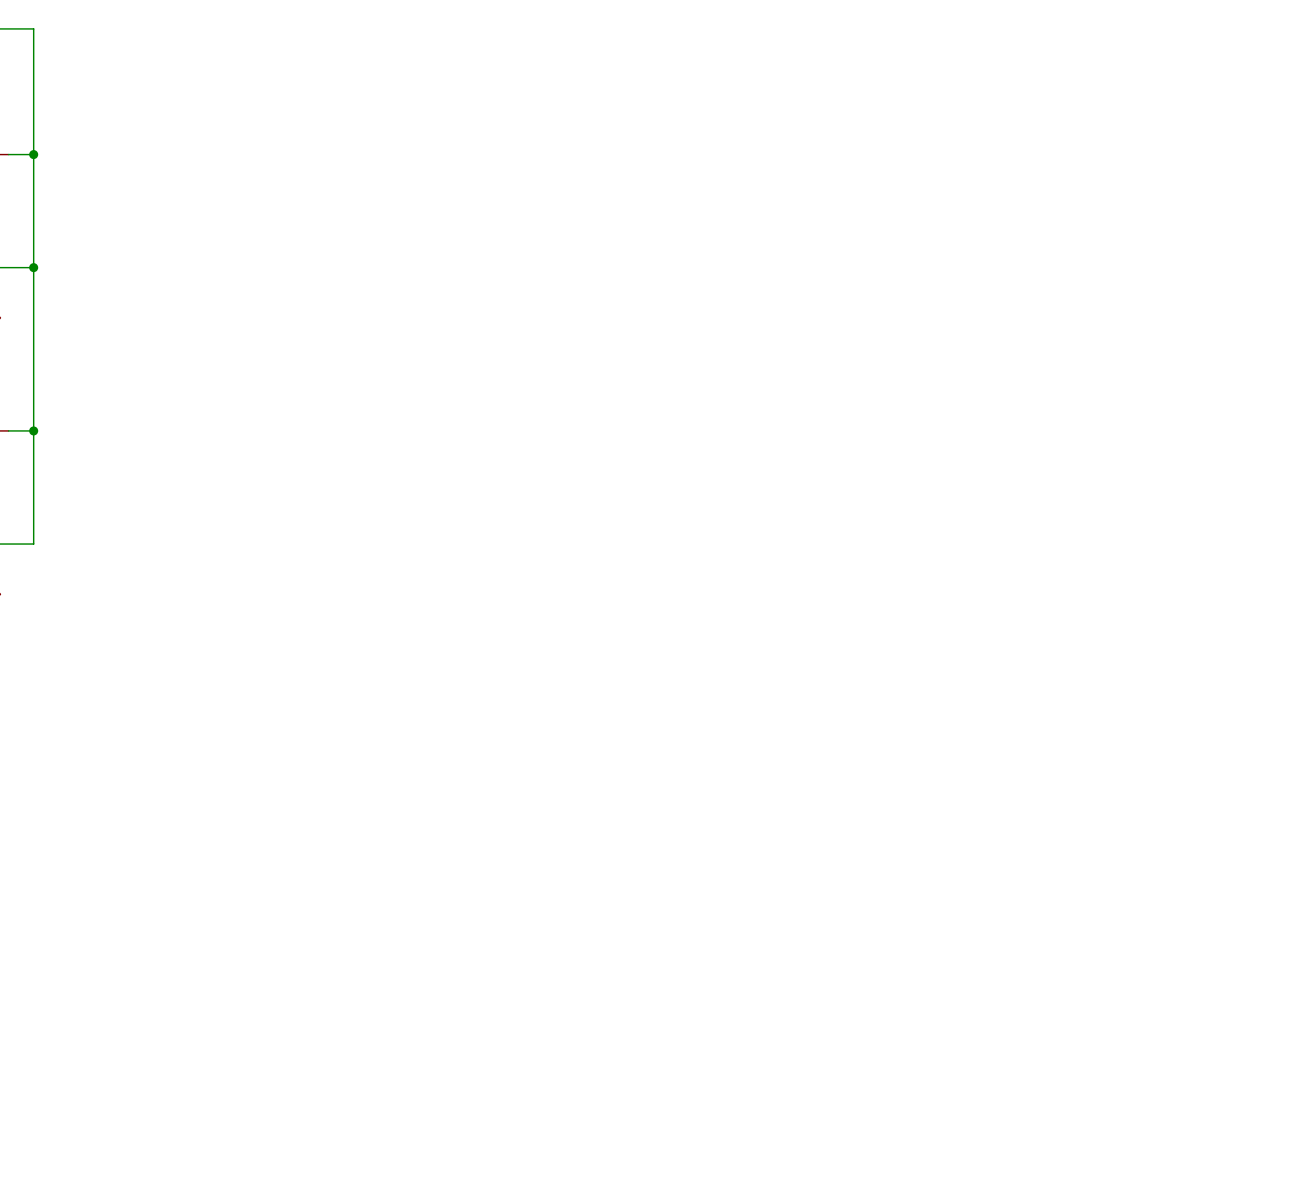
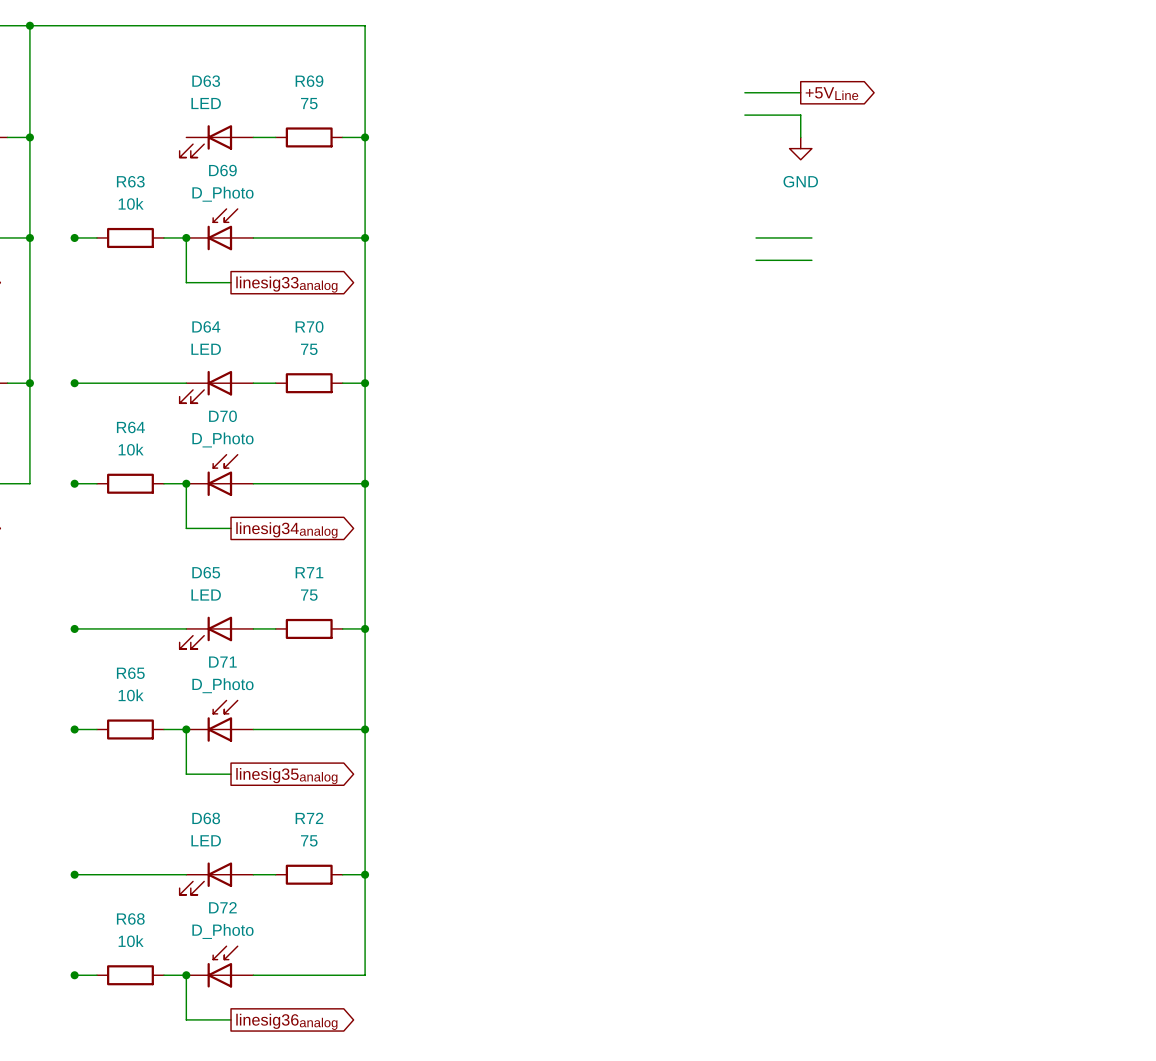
wire: none -> (29, 25) (365, 25) (365, 975) (253, 975)
junction: none -> (29, 25)
wire: none -> (744, 92) (800, 92)
global label: none -> +5VLine (831, 93)
wire: none -> (744, 115) (800, 115) (800, 137)
wire: none -> (253, 137) (275, 137)
R69: none -> 75 (309, 137)
wire: none -> (342, 137) (365, 137)
junction: none -> (365, 137)
D63: none -> LED (216, 141)
power symbol: none -> GND (800, 148)
D69: none -> D_Photo (219, 229)
wire: none -> (74, 237) (96, 237)
junction: none -> (74, 237)
R63: none -> 10k (130, 237)
wire: none -> (163, 237) (186, 237) (186, 282) (231, 282)
junction: none -> (186, 237)
wire: none -> (253, 237) (365, 237)
junction: none -> (365, 237)
wire: none -> (756, 237) (811, 237)
wire: none -> (756, 260) (811, 260)
global label: none -> linesig33analog (286, 284)
wire: none -> (74, 383) (186, 383)
junction: none -> (74, 383)
wire: none -> (253, 383) (275, 383)
R70: none -> 75 (309, 383)
wire: none -> (342, 383) (365, 383)
junction: none -> (365, 383)
D64: none -> LED (216, 387)
D70: none -> D_Photo (219, 475)
wire: none -> (74, 483) (96, 483)
junction: none -> (74, 483)
R64: none -> 10k (130, 483)
wire: none -> (163, 483) (186, 483) (186, 528) (231, 528)
junction: none -> (186, 483)
wire: none -> (253, 483) (365, 483)
junction: none -> (365, 483)
global label: none -> linesig34analog (286, 530)
wire: none -> (74, 628) (186, 628)
junction: none -> (74, 628)
wire: none -> (253, 628) (275, 628)
R71: none -> 75 (309, 628)
wire: none -> (342, 628) (365, 628)
junction: none -> (365, 628)
D65: none -> LED (216, 632)
D71: none -> D_Photo (219, 721)
wire: none -> (74, 729) (96, 729)
junction: none -> (74, 729)
R65: none -> 10k (130, 729)
wire: none -> (163, 729) (186, 729) (186, 774) (231, 774)
junction: none -> (186, 729)
wire: none -> (253, 729) (365, 729)
junction: none -> (365, 729)
global label: none -> linesig35analog (286, 776)
wire: none -> (74, 874) (186, 874)
junction: none -> (74, 874)
wire: none -> (253, 874) (275, 874)
R72: none -> 75 (309, 874)
wire: none -> (342, 874) (365, 874)
junction: none -> (365, 874)
D68: none -> LED (216, 878)
D72: none -> D_Photo (219, 966)
wire: none -> (74, 975) (96, 975)
junction: none -> (74, 975)
R68: none -> 10k (130, 975)
wire: none -> (163, 975) (186, 975) (186, 1019) (231, 1019)
junction: none -> (186, 975)
global label: none -> linesig36analog (286, 1021)

